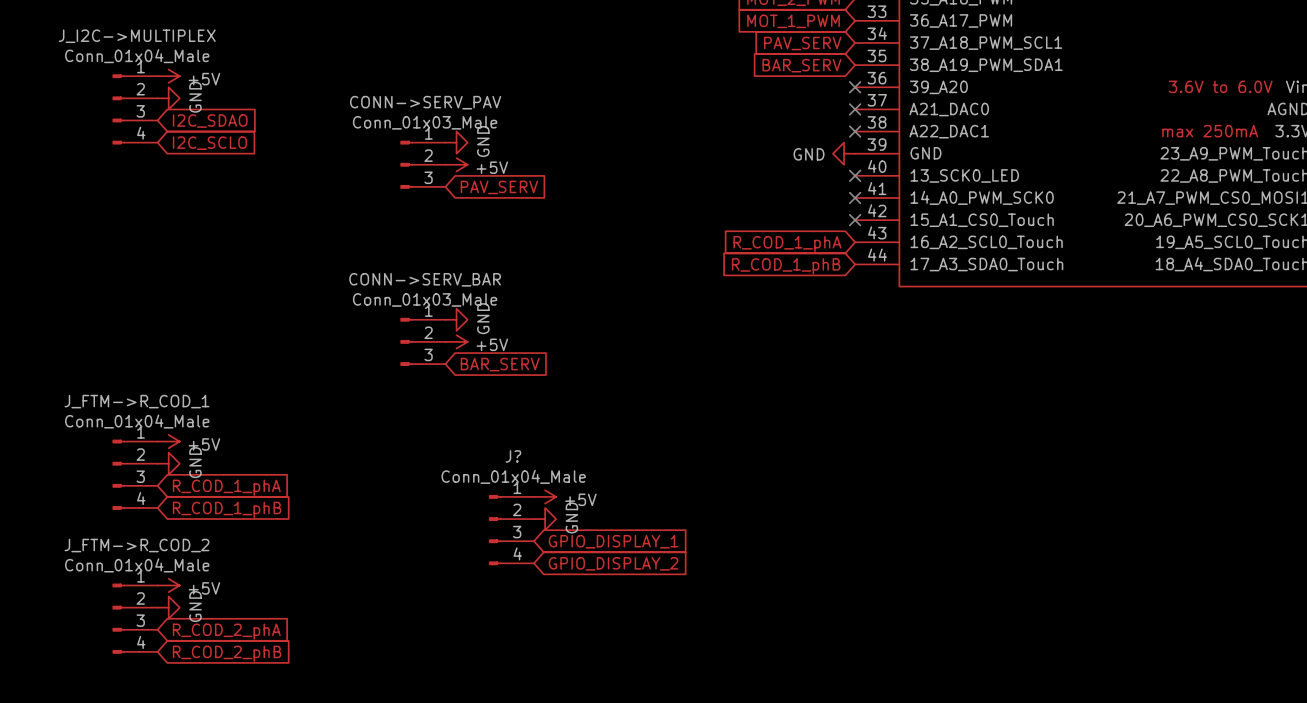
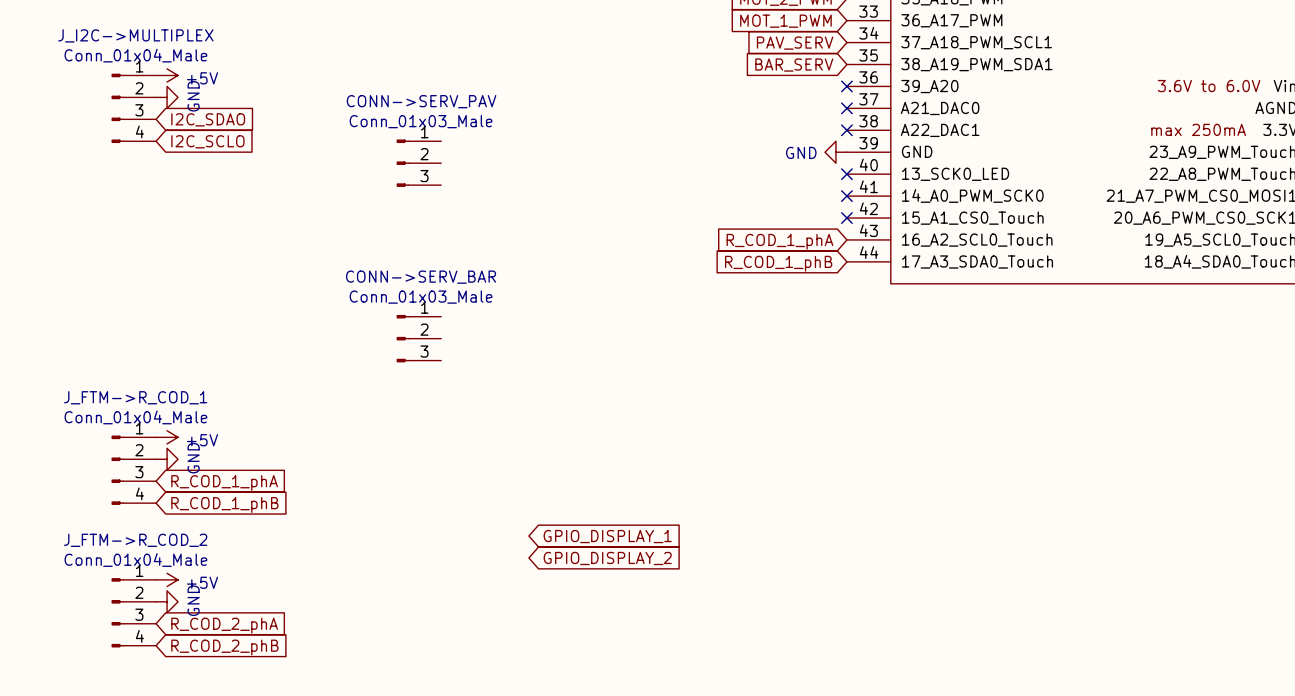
power symbol: GND (456, 142) -> none
power symbol: +5V (456, 164) -> none
global label: PAV_SERV (499, 187) -> none
power symbol: GND (456, 319) -> none
power symbol: +5V (456, 341) -> none
global label: BAR_SERV (500, 364) -> none
power symbol: +5V (545, 496) -> none
power symbol: GND (545, 519) -> none
J?: Conn_01x04_Male (511, 530) -> none

